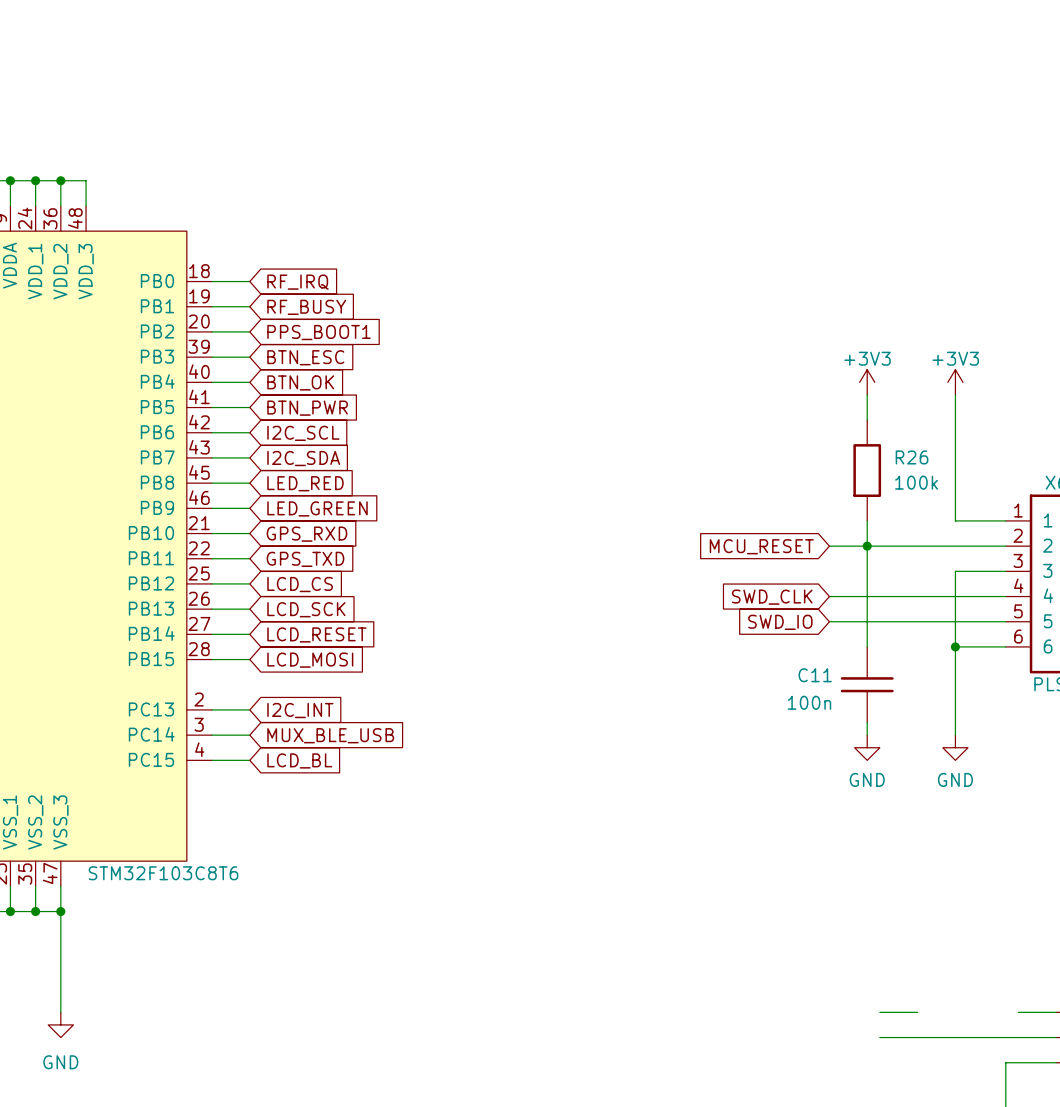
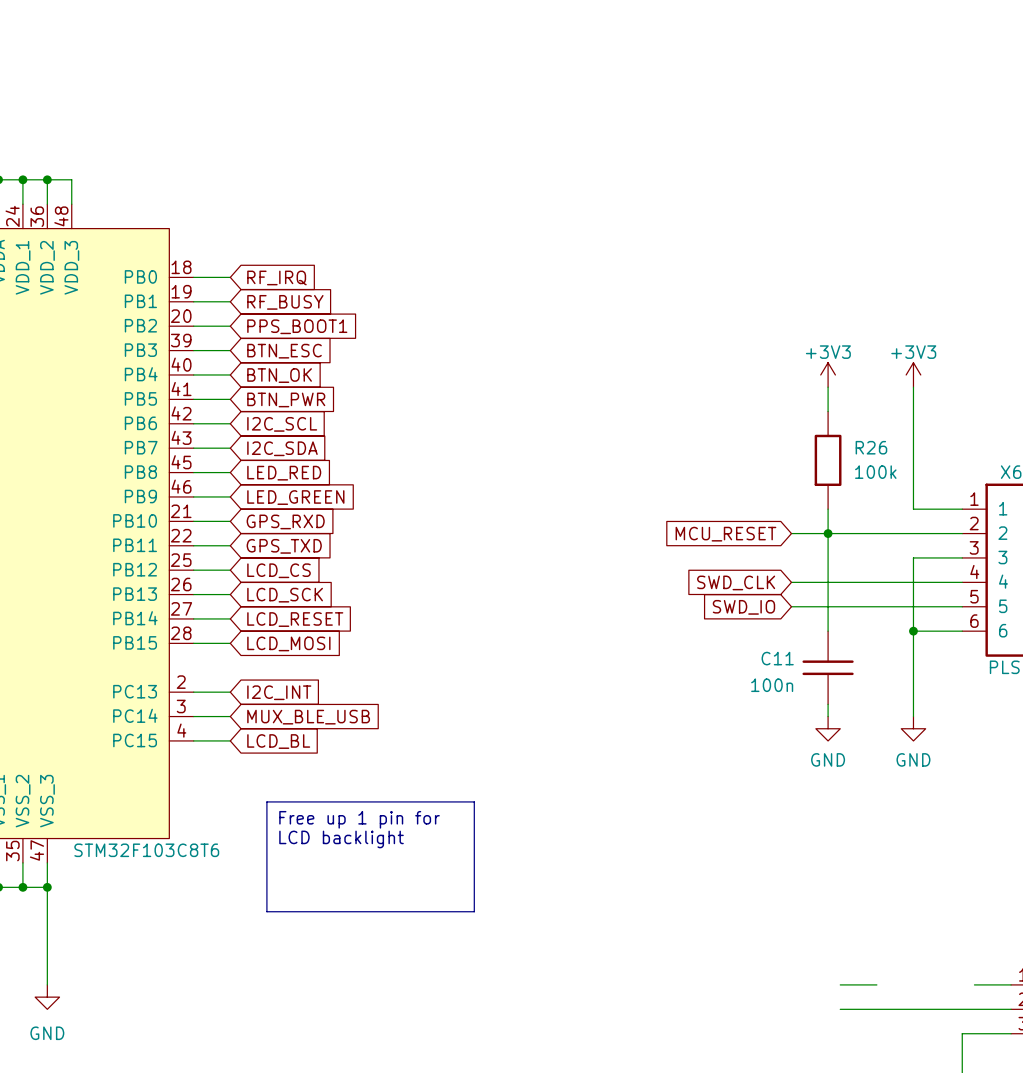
line: none -> (266, 801) (474, 801) (474, 911) (266, 911) (266, 801)
text: none -> Free up 1 pin for (359, 819)
text: none -> LCD backlight (341, 839)

